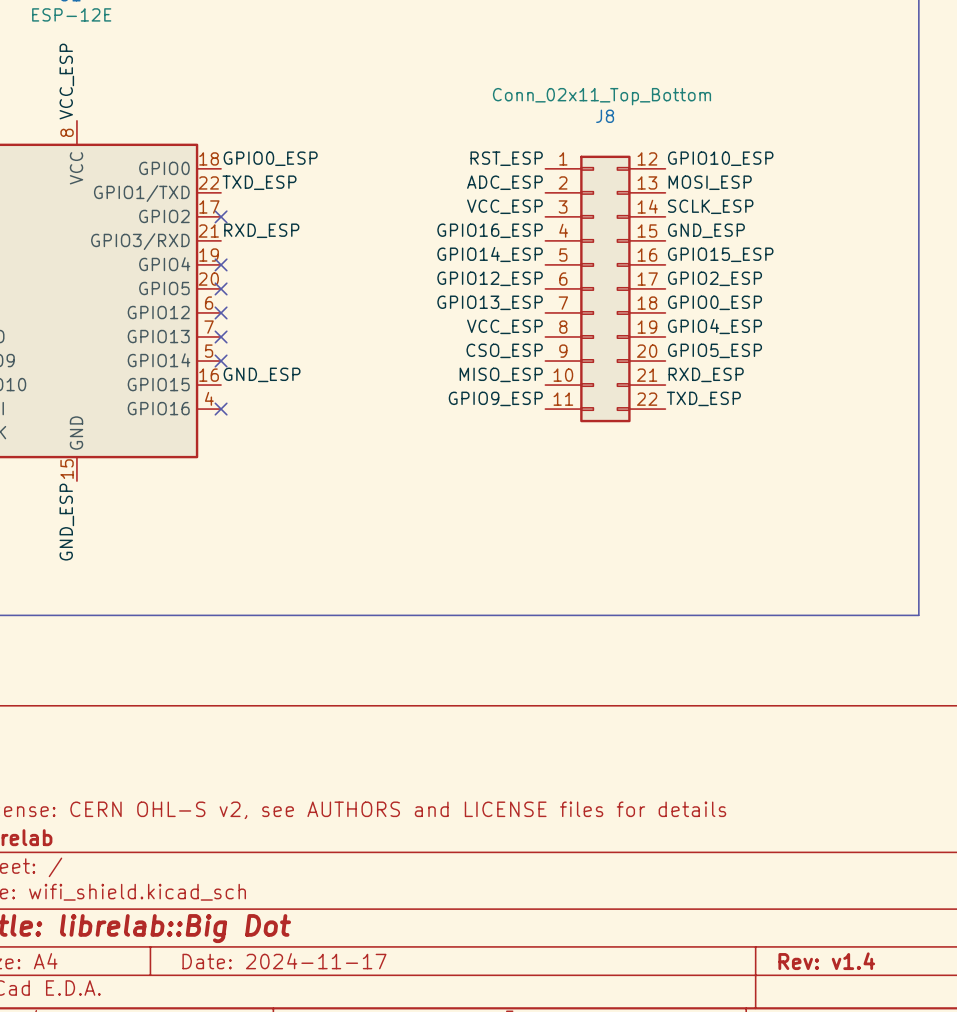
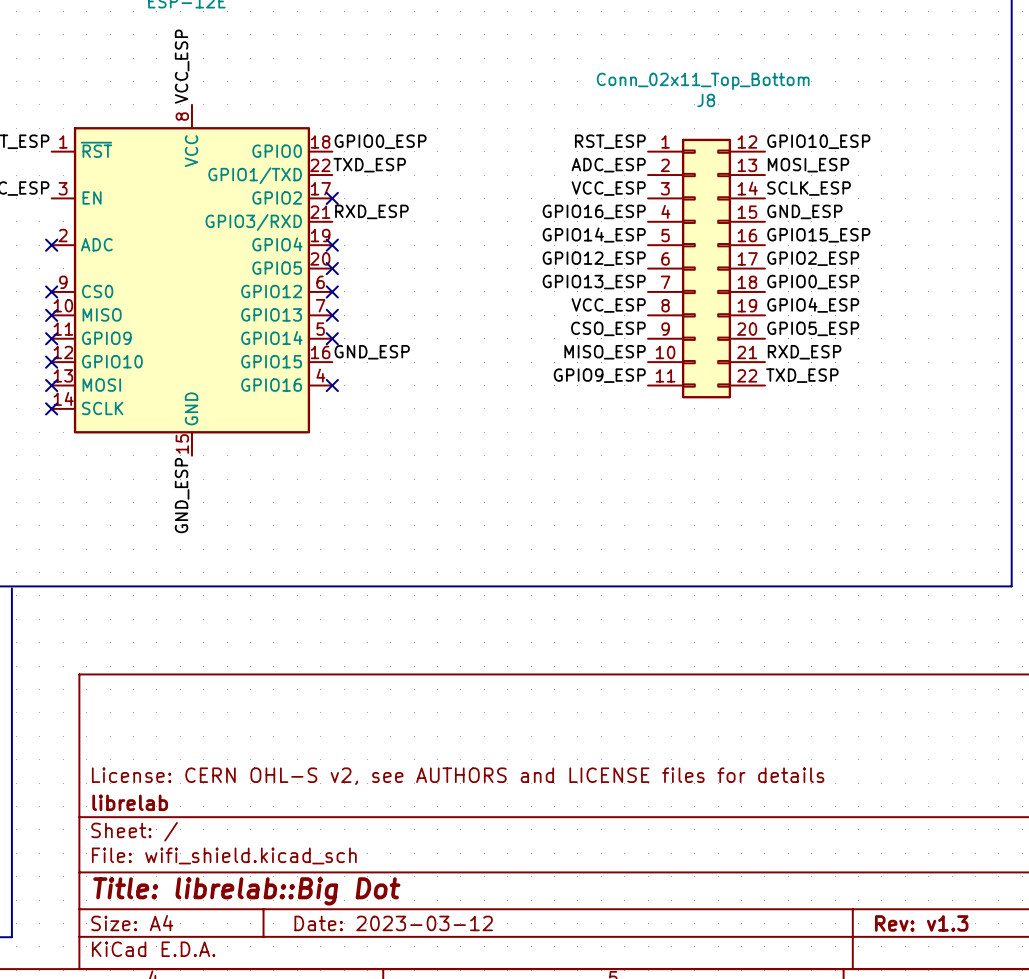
title block: Date: 2024-11-17 (284, 961) -> Date: 2023-03-12 (393, 923)
title block: Rev: v1.4 (826, 961) -> Rev: v1.3 (921, 923)

